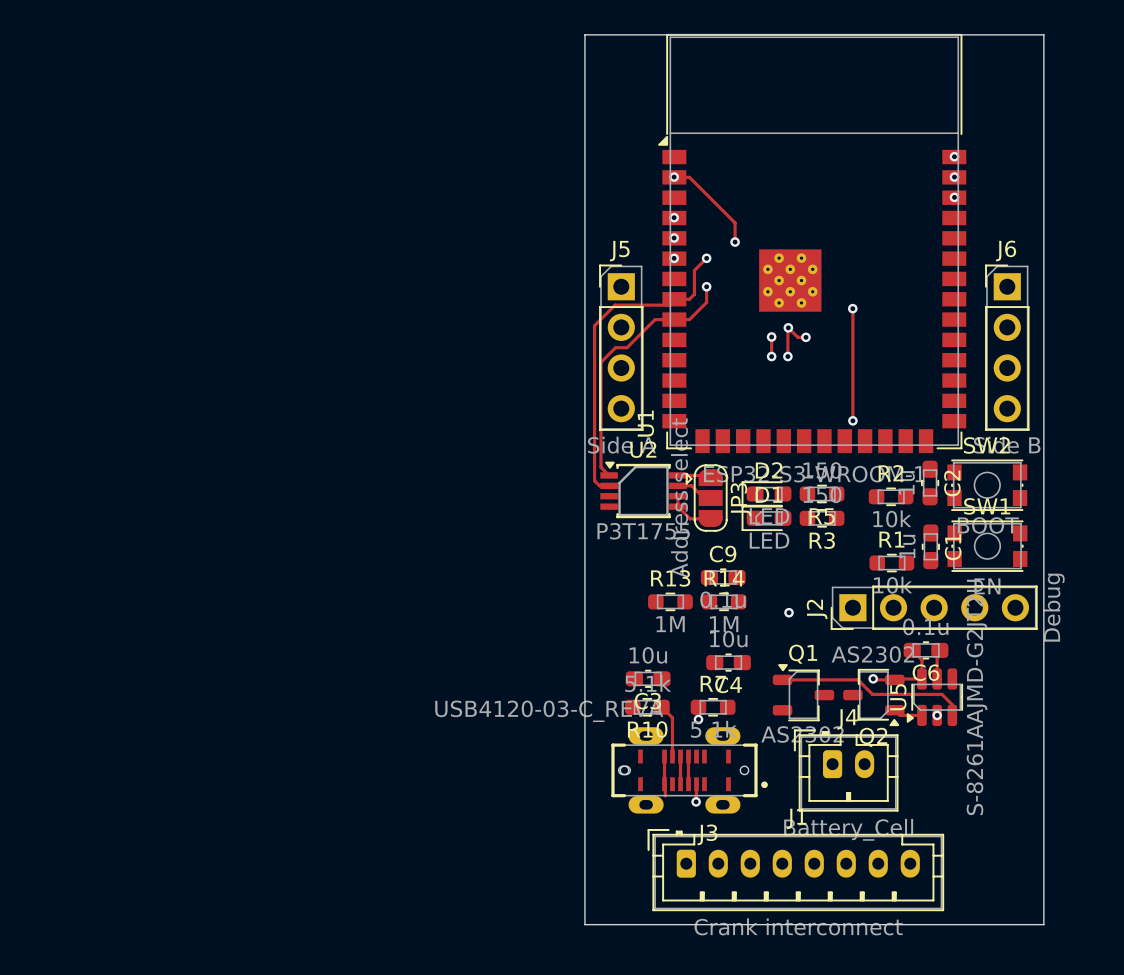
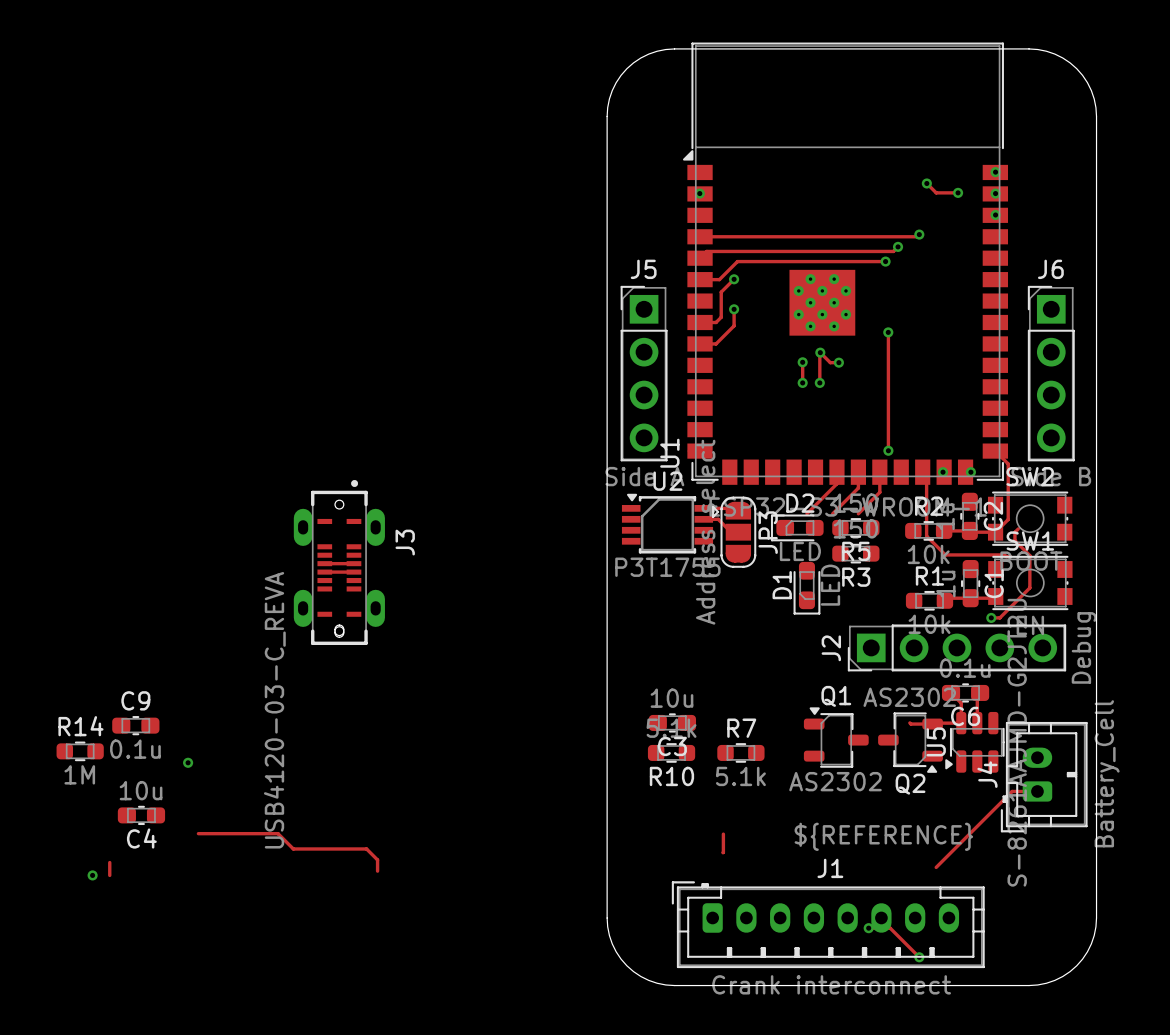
board edge: (584, 34) (1043, 34) (1043, 924) (584, 924) (584, 34) -> (674, 48) (648, 54) (626, 68) (616, 82) (607, 107) (607, 918) (612, 943) (621, 959) (633, 971) (648, 980) (665, 984) (1029, 985) (1054, 980) (1070, 971) (1082, 959) (1091, 943) (1096, 918) (1096, 116) (1091, 90) (1082, 75) (1070, 62) (1054, 54) (1037, 49) (674, 48)
track: none -> (926, 183) (936, 192) (958, 192)
via: none -> (926, 183)
via: none -> (958, 192)
track: (674, 177) (689, 177) (735, 222) (735, 242) -> none
track: none -> (919, 234) (917, 236) (700, 236)
via: none -> (919, 234)
via: (674, 217) -> none
track: none -> (898, 246) (893, 251) (706, 251) (700, 258)
via: none -> (898, 246)
via: (674, 238) -> none
track: none -> (885, 261) (737, 261) (719, 279) (700, 279)
via: none -> (885, 261)
via: (735, 242) -> none
via: (674, 258) -> none
track: (668, 305) (615, 305) (594, 325) (594, 480) (599, 485) (609, 485) -> none
track: (674, 319) (655, 319) (627, 347) (615, 347) (600, 362) (600, 467) (609, 475) -> none
track: none -> (995, 451) (1008, 463) (1008, 519) (995, 532) (944, 530)
track: none -> (836, 472) (836, 483) (806, 513)
track: none -> (858, 472) (858, 488) (832, 513)
track: none -> (879, 472) (879, 492) (858, 513)
track: none -> (922, 472) (926, 476) (926, 536) (945, 554) (1004, 554) (1010, 556)
via: none -> (943, 472)
via: none -> (970, 472)
track: none -> (1018, 528) (1014, 532) (1014, 540) (1029, 555) (1029, 587) (999, 617) (991, 617)
track: (677, 496) (677, 506) (690, 518) (710, 518) -> none
D1 rotation: 0° (766, 518) -> 90° counterclockwise (806, 588)
D1 position: (766, 518) -> (806, 588)
track: none -> (324, 563) (353, 563)
track: none -> (324, 572) (353, 572)
C9 position: (723, 577) -> (135, 725)
via: none -> (991, 617)
R13: 1M (670, 601) -> none
R14 position: (724, 601) -> (80, 751)
J2 position: (934, 607) -> (956, 647)
via: (789, 612) -> none
C4 position: (728, 662) -> (141, 815)
via: (873, 678) -> none
track: (782, 679) (858, 679) (872, 694) (941, 694) (952, 704) (952, 715) -> none
track: (661, 707) (672, 717) (672, 756) -> none
track: (894, 710) (899, 715) (921, 715) -> none
via: (937, 715) -> none
via: none -> (188, 762)
via: (698, 719) -> none
track: none -> (1037, 791) (1012, 791) (936, 867)
track: (664, 756) (665, 795) -> none
track: (680, 756) (680, 784) -> none
track: (688, 756) (688, 784) -> none
J3 rotation: 0° (689, 770) -> 90° counterclockwise (339, 562)
J3 position: (689, 770) -> (339, 562)
J4 rotation: 0° (846, 770) -> 90° counterclockwise (1044, 777)
J4 position: (846, 770) -> (1044, 777)
track: none -> (198, 833) (278, 833) (293, 848) (366, 848) (377, 859) (377, 871)
text: none -> ${REFERENCE} (883, 836)
via: (696, 801) -> none
track: none -> (109, 862) (109, 875)
via: none -> (92, 875)
track: none -> (868, 928) (890, 928) (919, 957)
via: none -> (868, 928)
via: none -> (919, 957)

